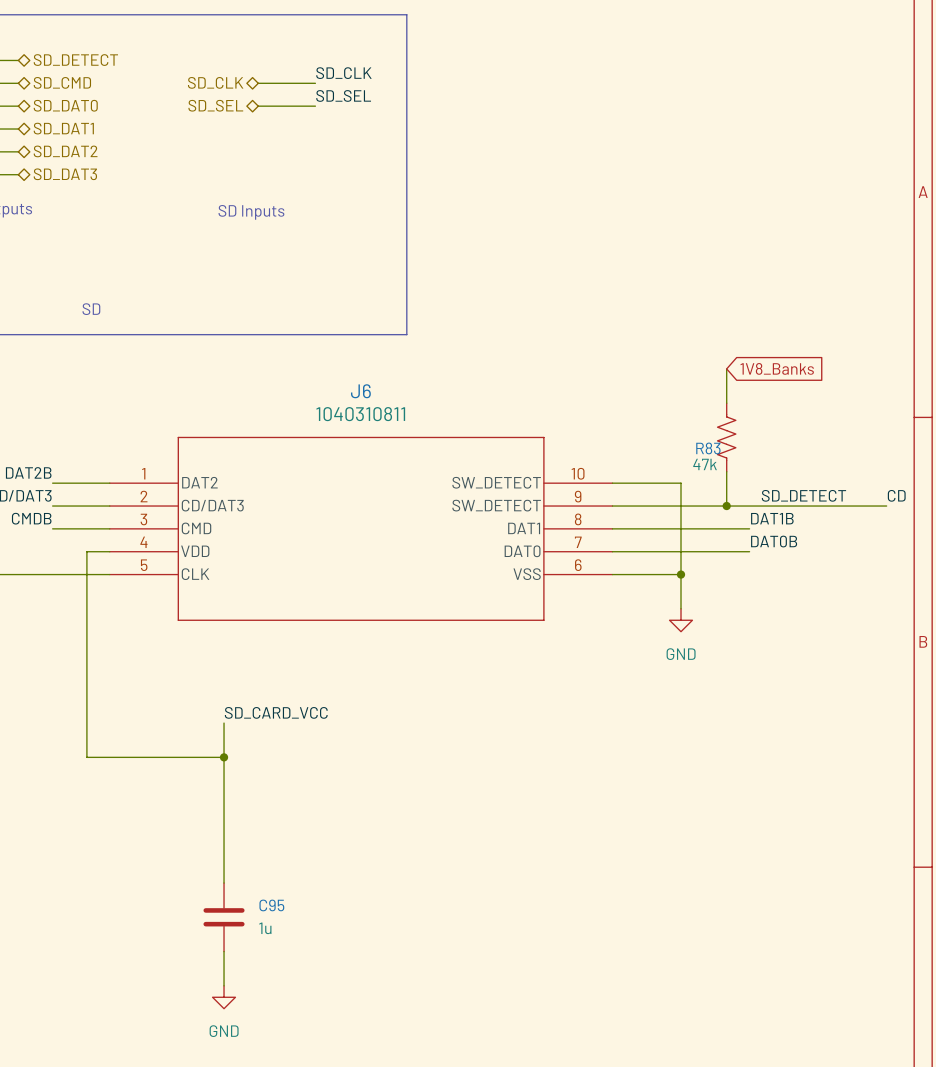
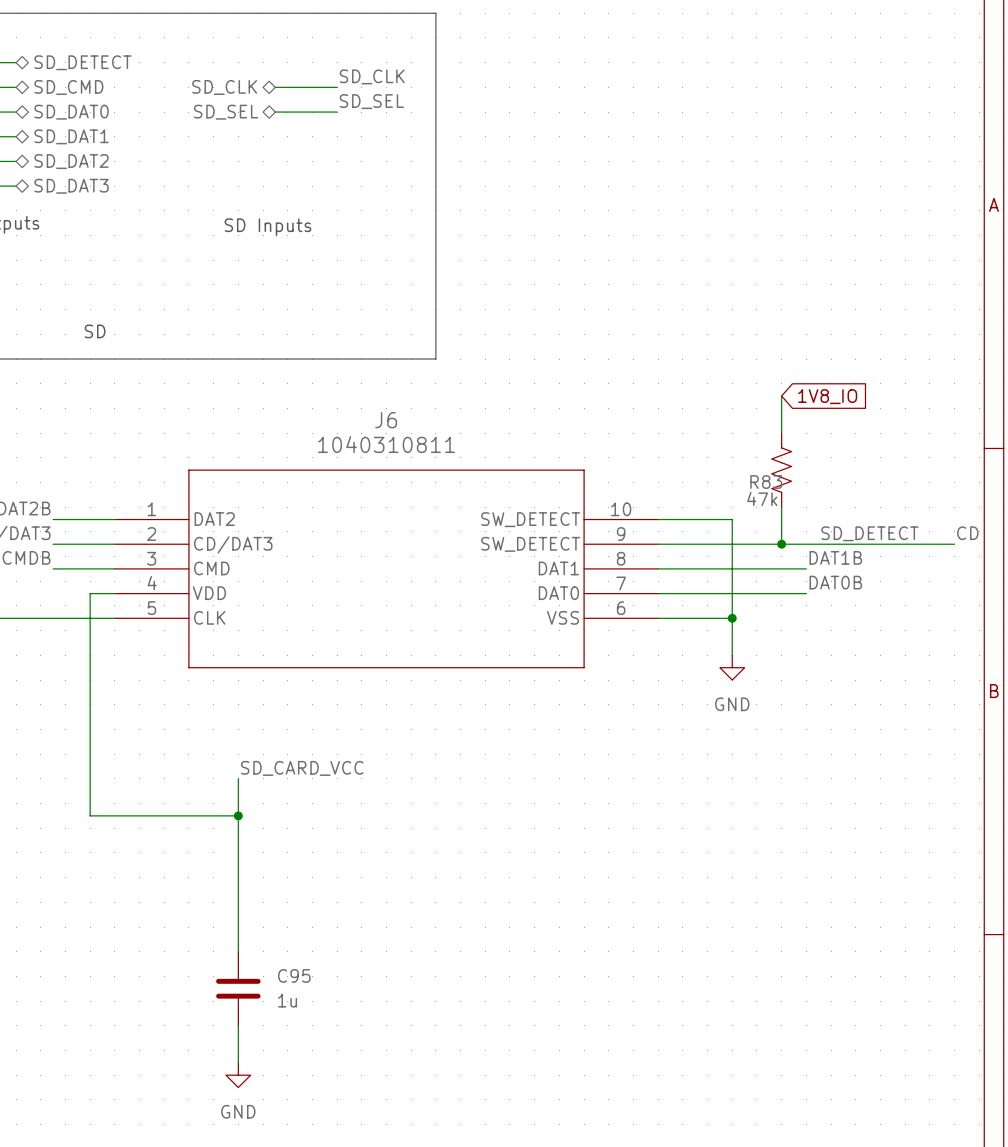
global label: 1V8_Banks (777, 368) -> 1V8_IO (827, 396)

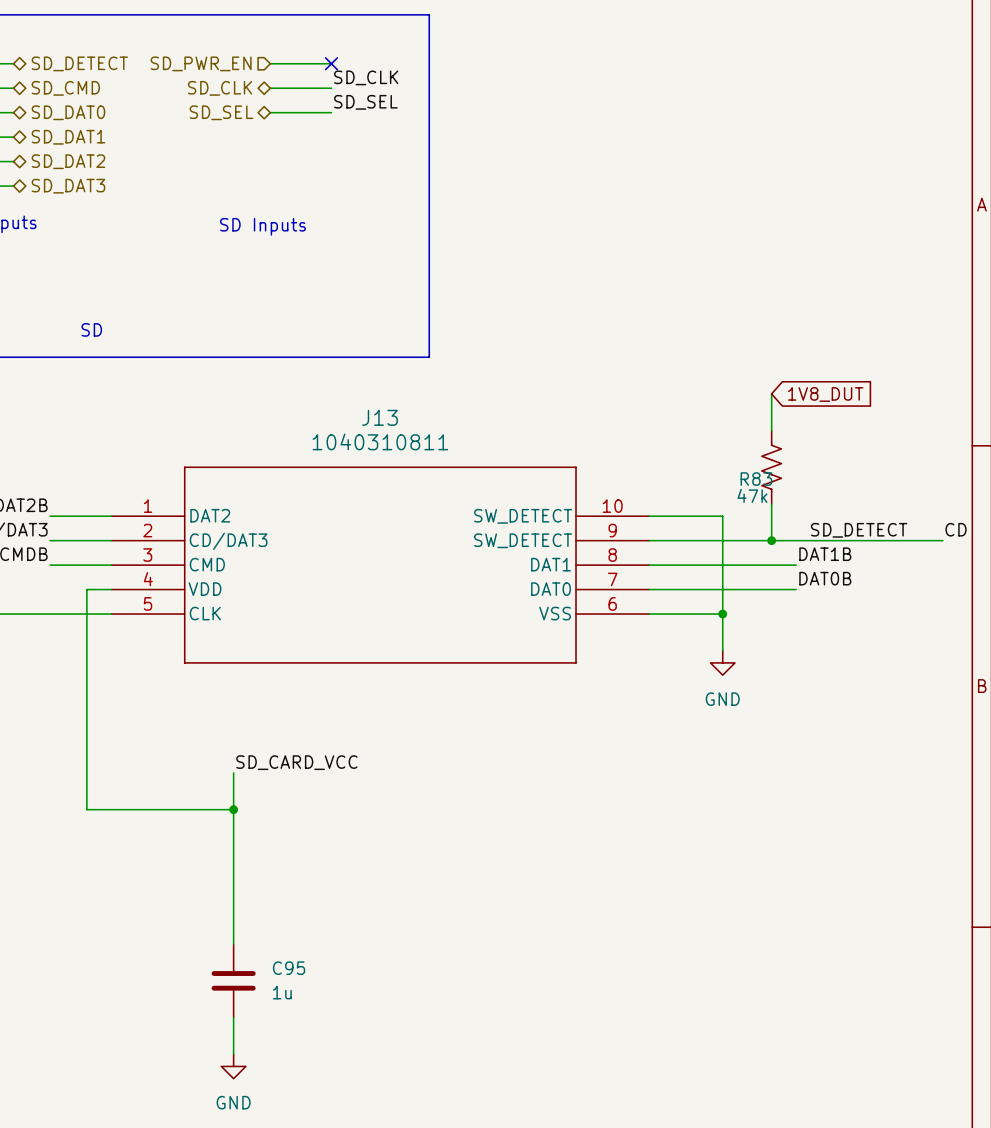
hierarchical label: none -> SD_PWR_EN (201, 63)
wire: none -> (270, 63) (331, 63)
no-connect mark: none -> (331, 63)
global label: 1V8_IO (827, 396) -> 1V8_DUT (825, 394)
J6 name: J6 (386, 420) -> J13 (380, 417)

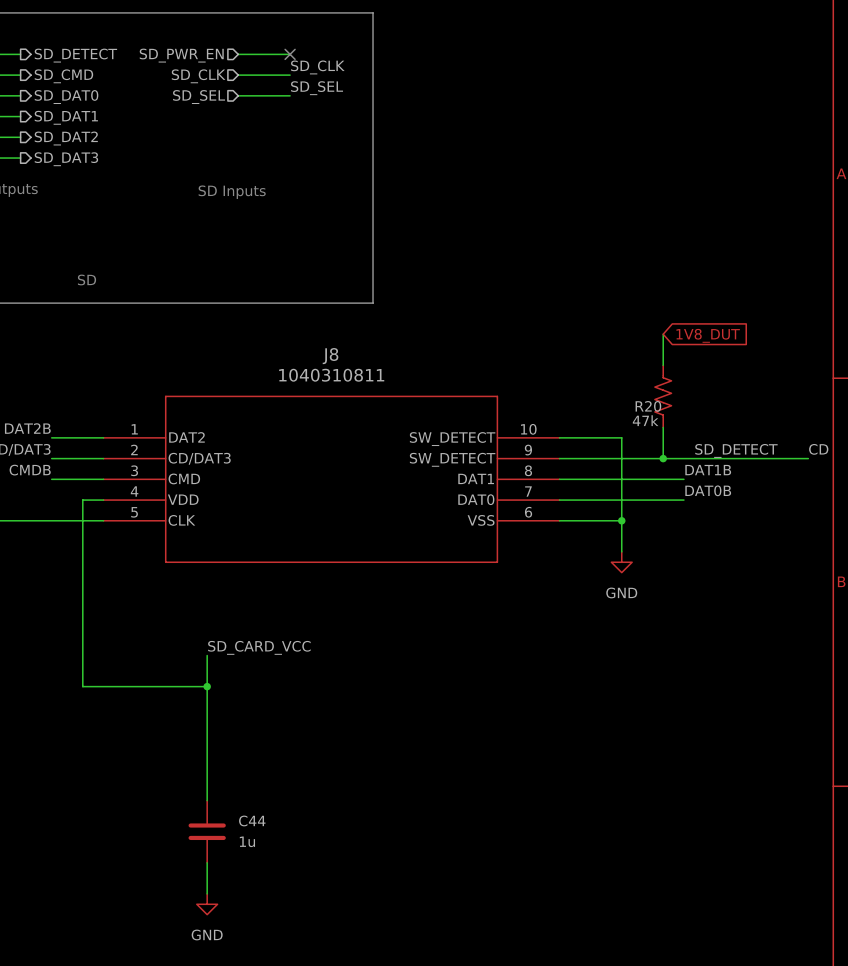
hierarchical label shape: bidirectional (79, 63) -> output (75, 55)
hierarchical label shape: bidirectional (65, 88) -> output (63, 76)
hierarchical label shape: bidirectional (220, 88) -> input (198, 76)
hierarchical label shape: bidirectional (68, 112) -> output (66, 97)
hierarchical label shape: bidirectional (221, 112) -> input (199, 97)
hierarchical label shape: bidirectional (68, 137) -> output (66, 117)
hierarchical label shape: bidirectional (68, 161) -> output (66, 138)
hierarchical label shape: bidirectional (68, 186) -> output (66, 159)
J13 name: J13 (380, 417) -> J8 (330, 356)
R83 name: R83 (756, 479) -> R20 (648, 406)
C95 name: C95 (289, 968) -> C44 (252, 820)

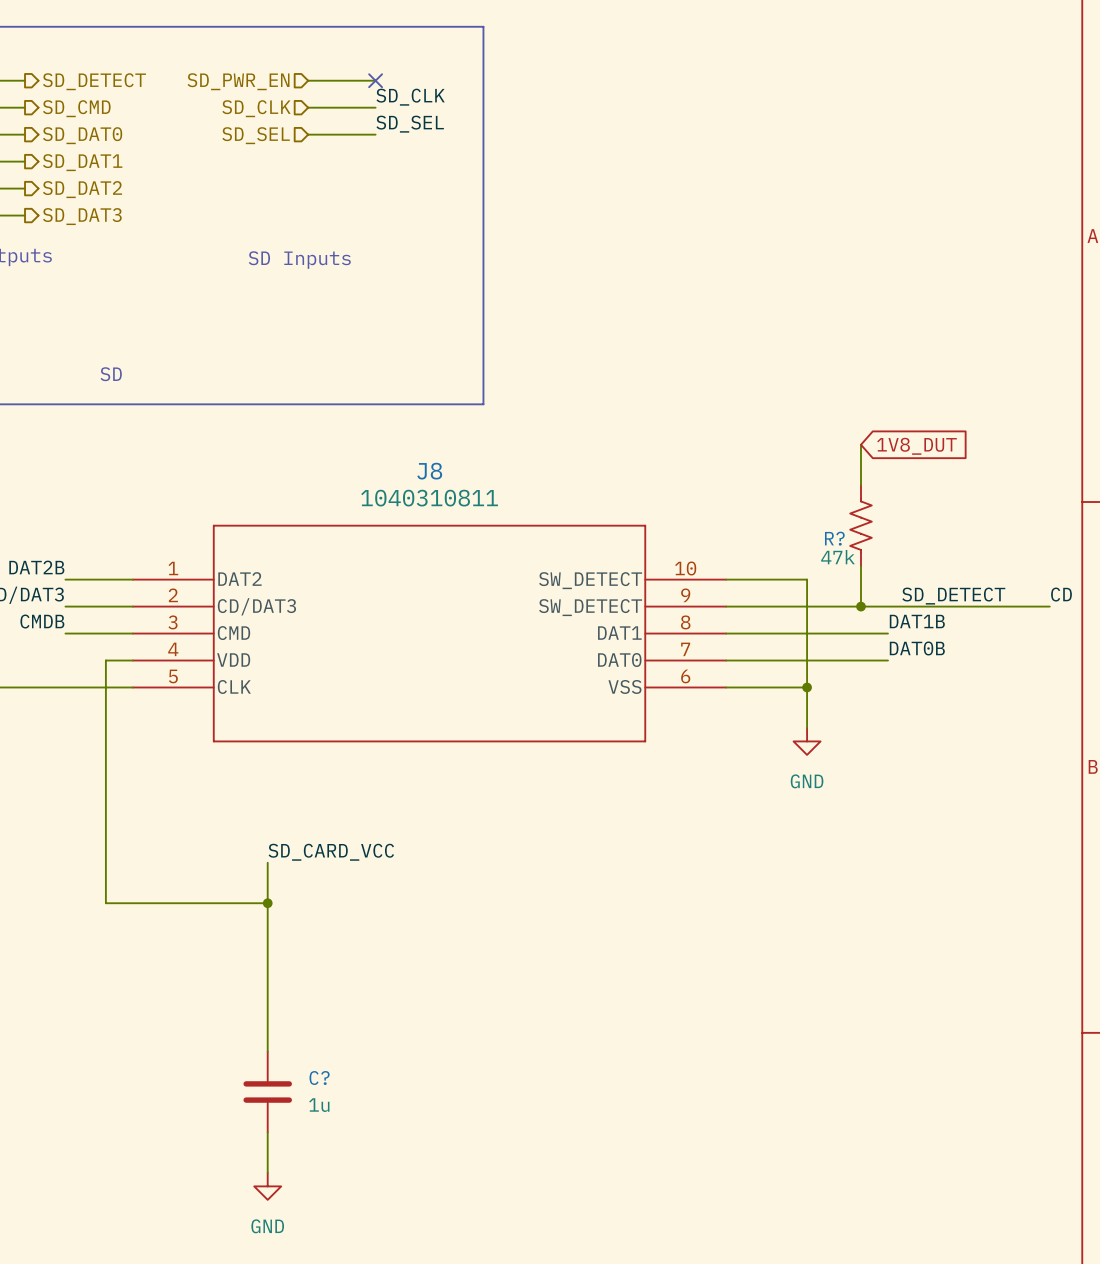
R20 name: R20 (648, 406) -> R? (834, 538)
C44 name: C44 (252, 820) -> C? (319, 1078)

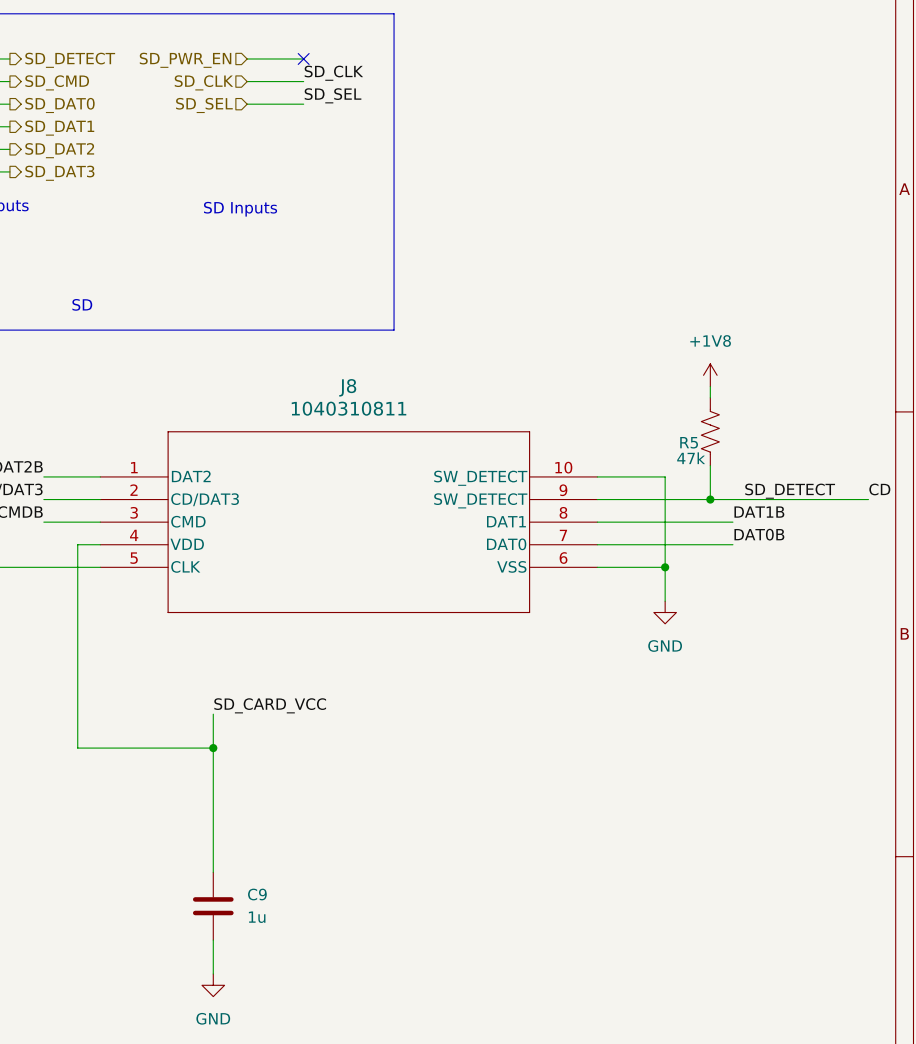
global label: 1V8_DUT (917, 446) -> none
power symbol: none -> +1V8 (710, 375)
R? name: R? (834, 538) -> R5 (689, 442)
C? name: C? (319, 1078) -> C9 (257, 894)

